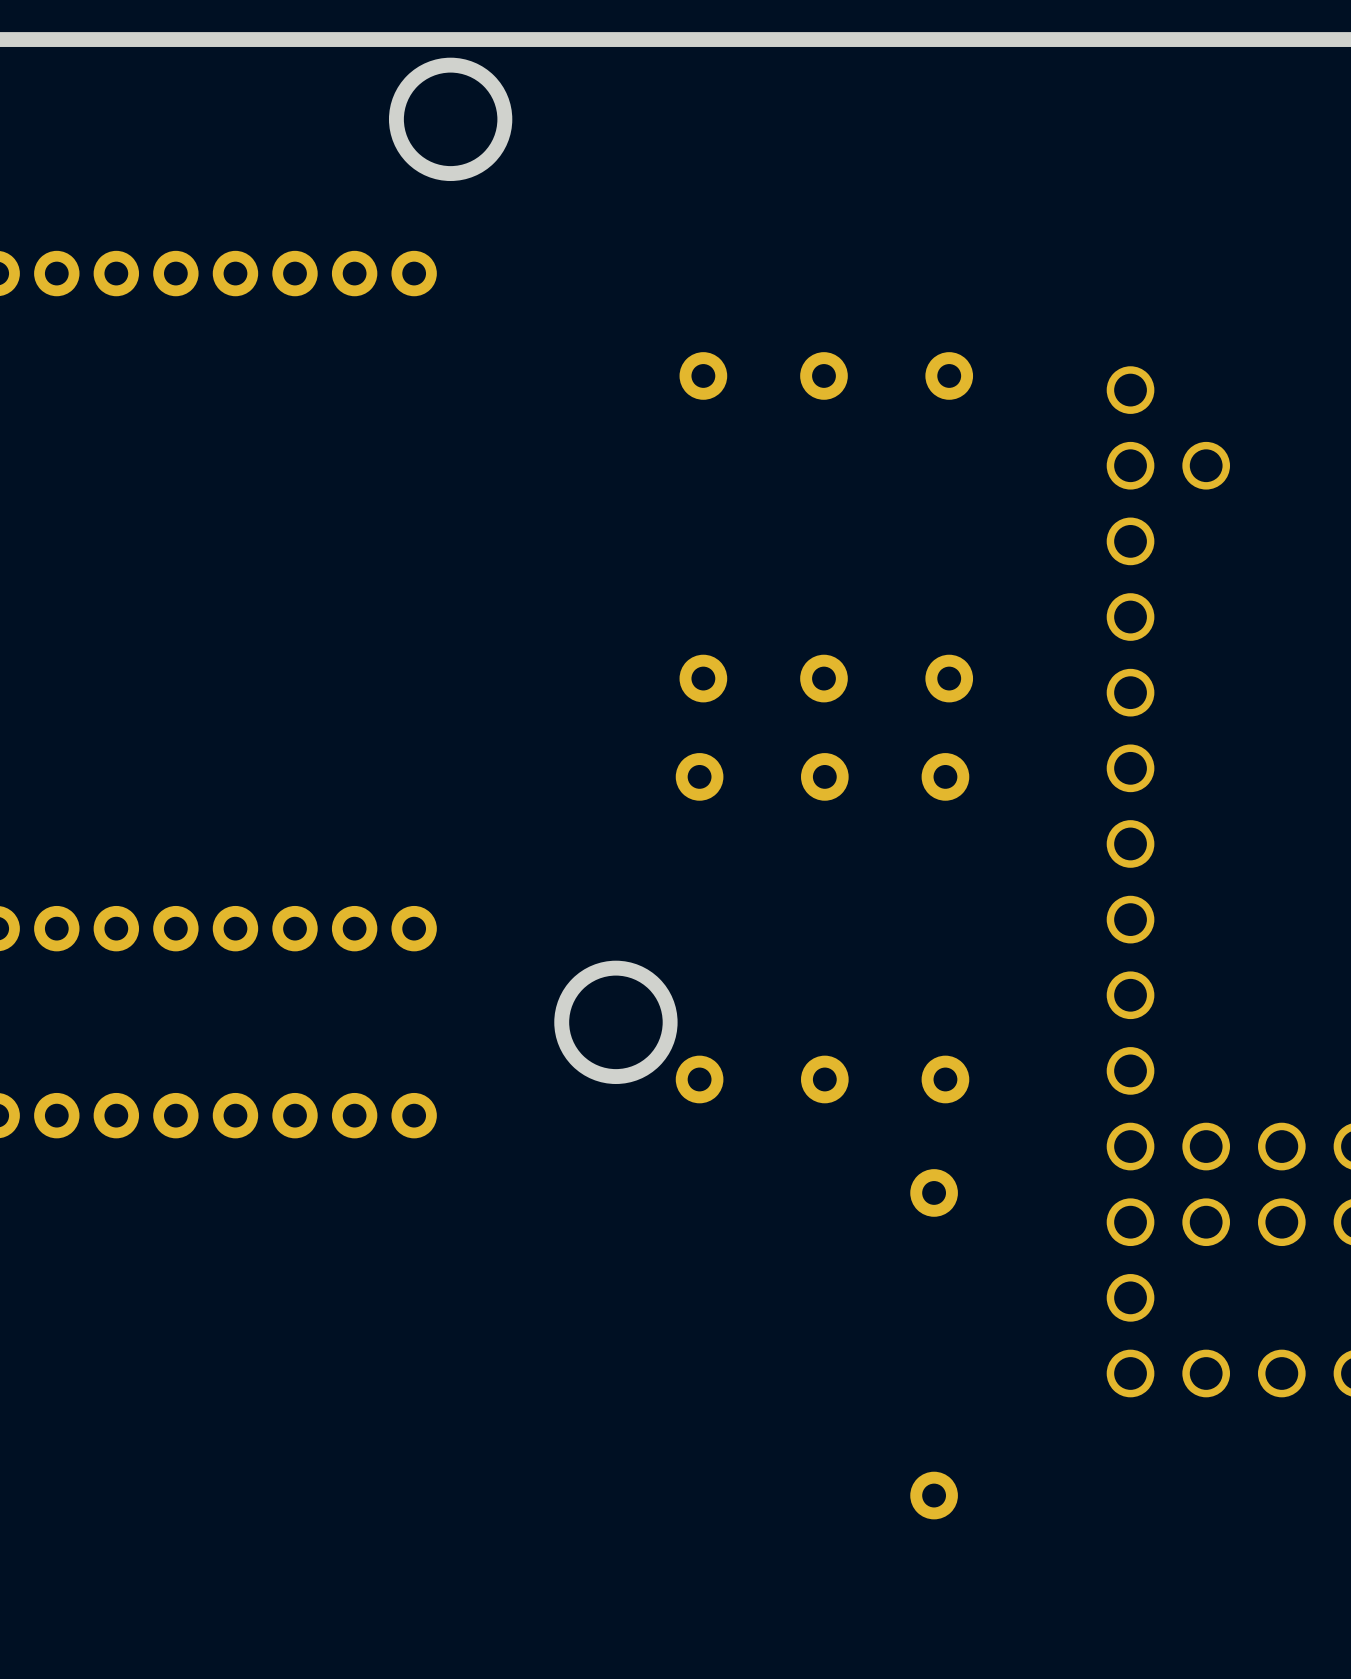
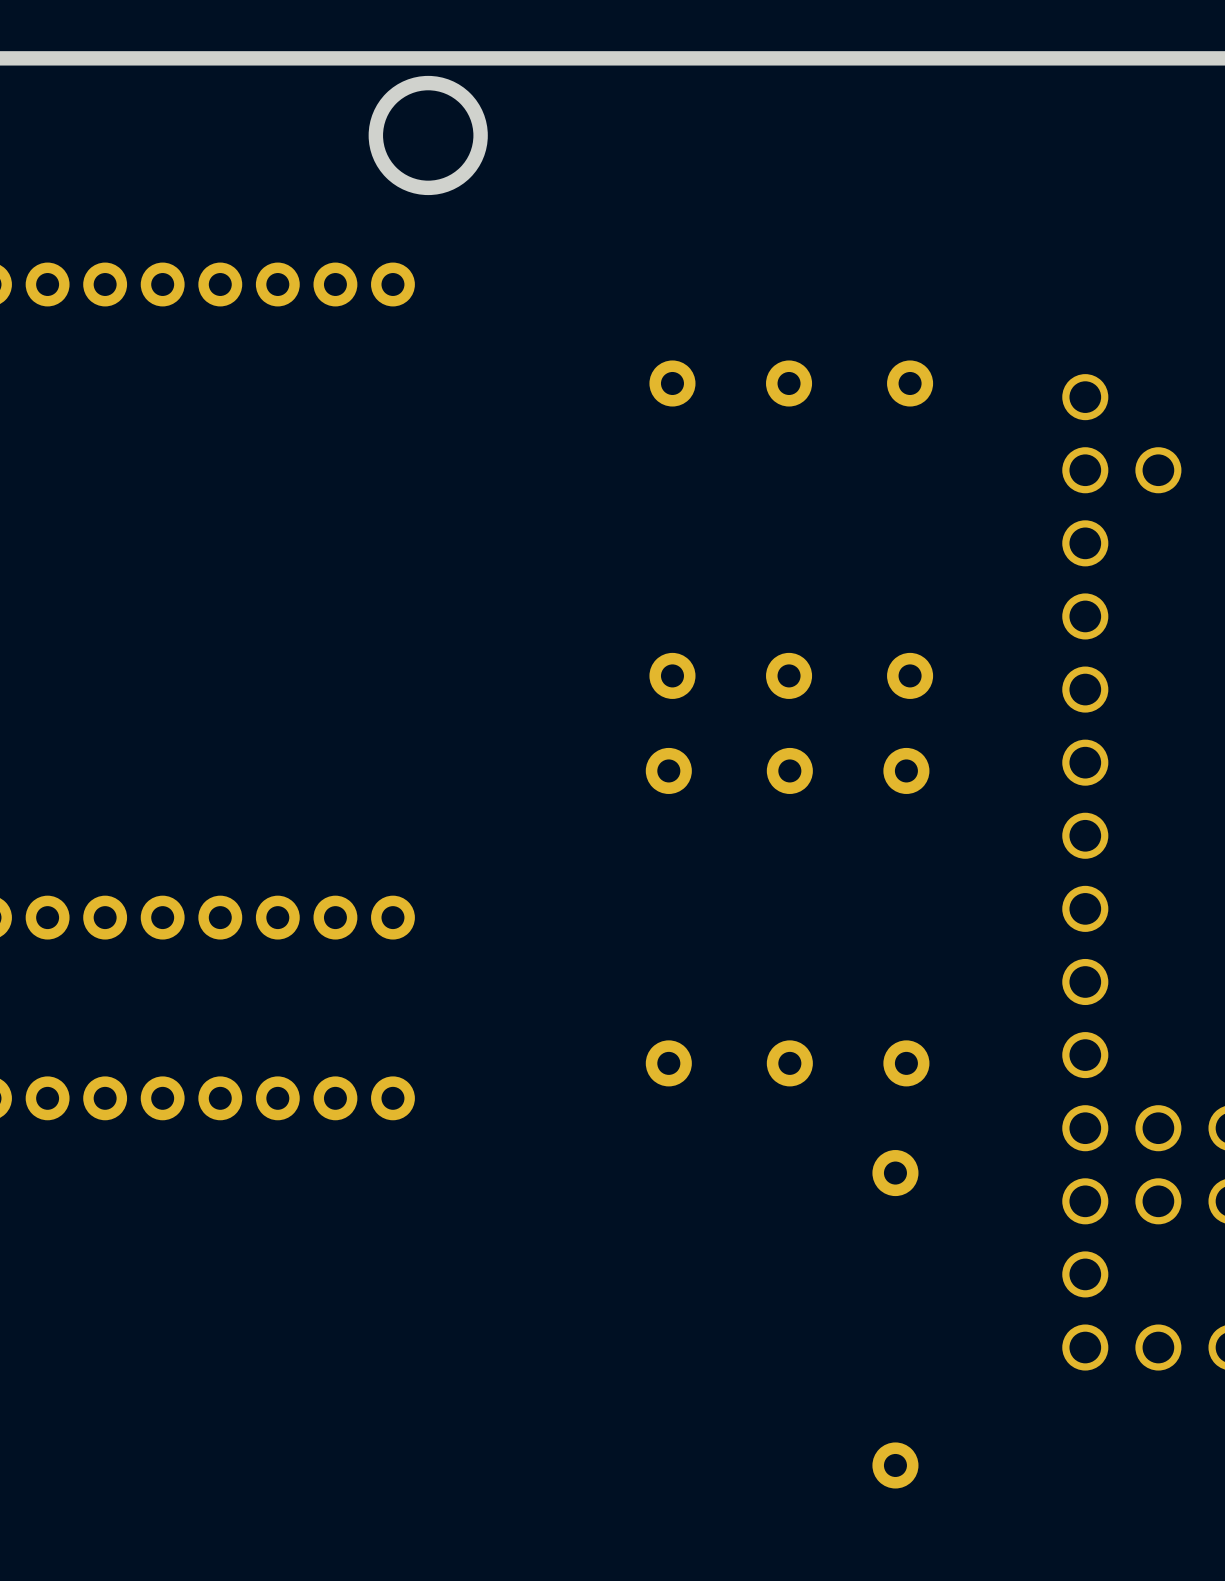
round board edge: [554, 960, 678, 1085] -> none

